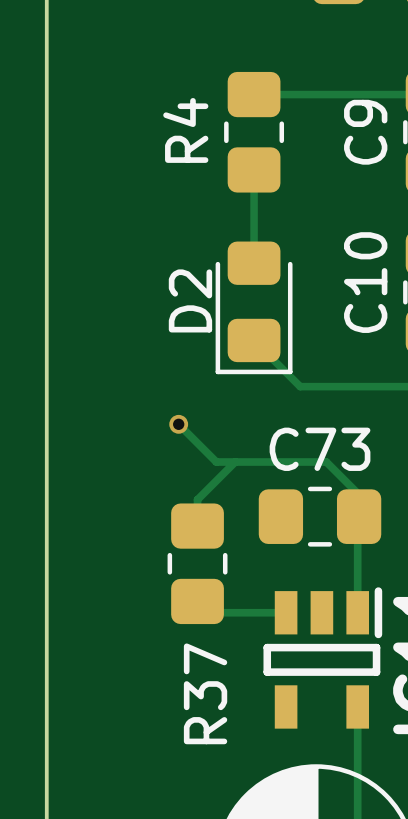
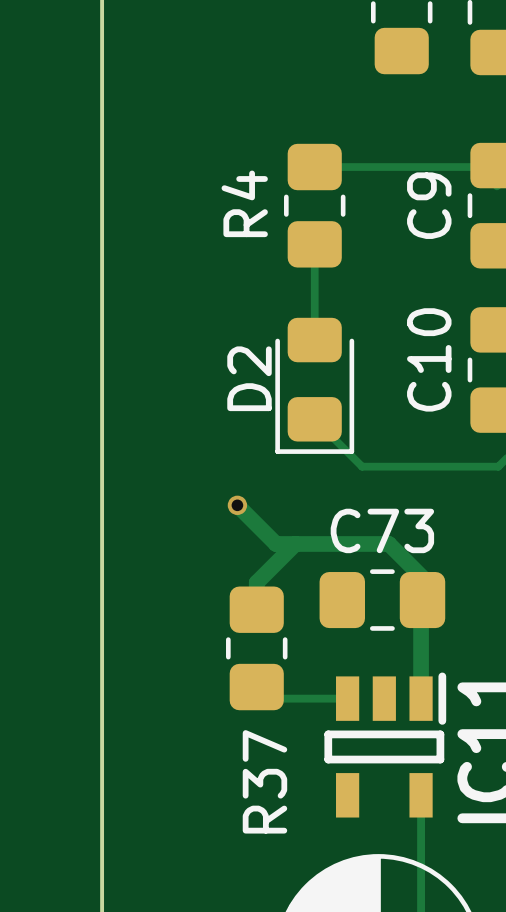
track width: thin (178, 424) (216, 462) (326, 462) (359, 494) -> thick (237, 505) (276, 543) (388, 543) (422, 577)
track width: thin (235, 462) (197, 499) (197, 526) -> thick (295, 543) (256, 582) (256, 609)
track width: thin (357, 518) (357, 612) -> thick (421, 601) (421, 698)

